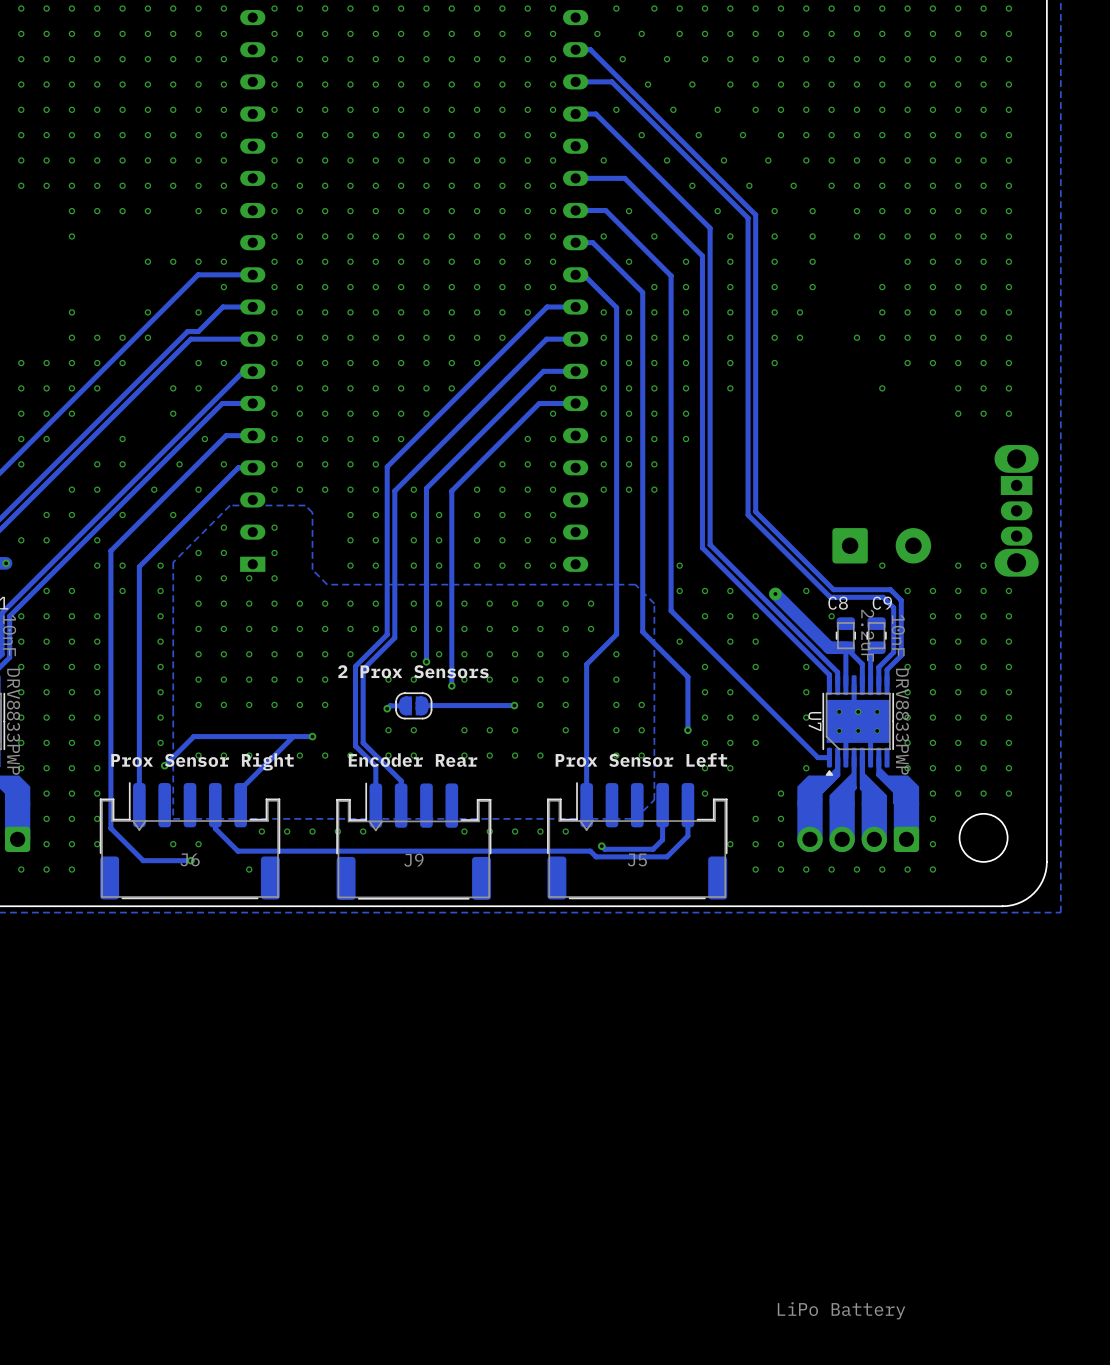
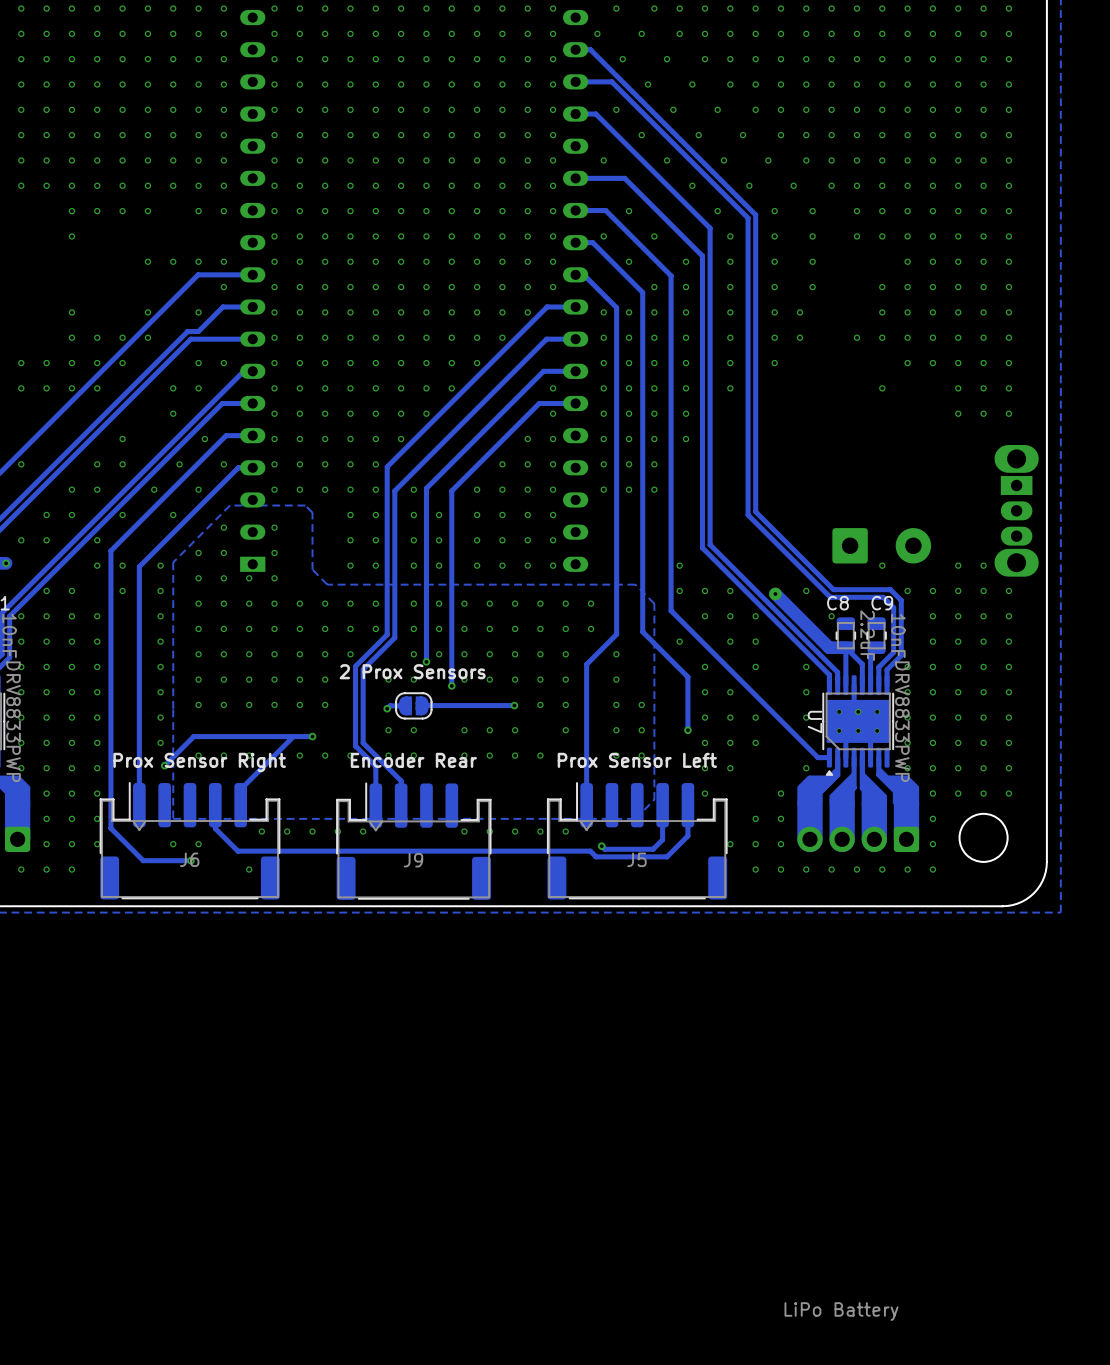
via: (21, 413) -> none
via: (46, 413) -> none
via: (71, 413) -> none
via: (21, 439) -> none
via: (46, 439) -> none

